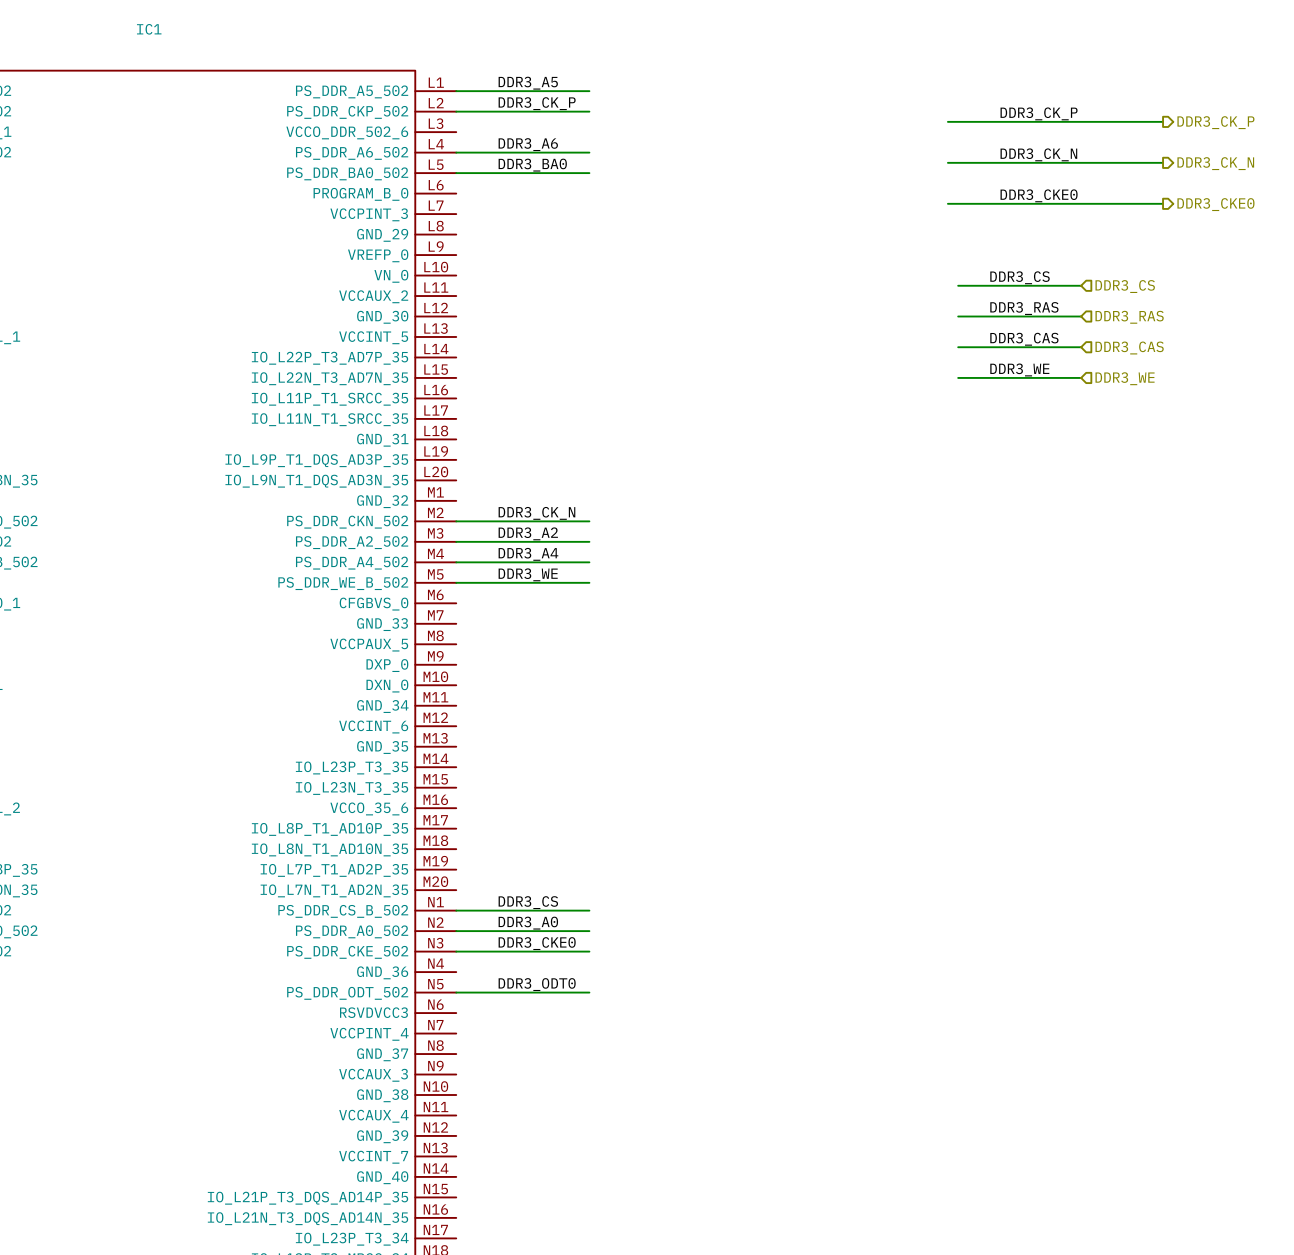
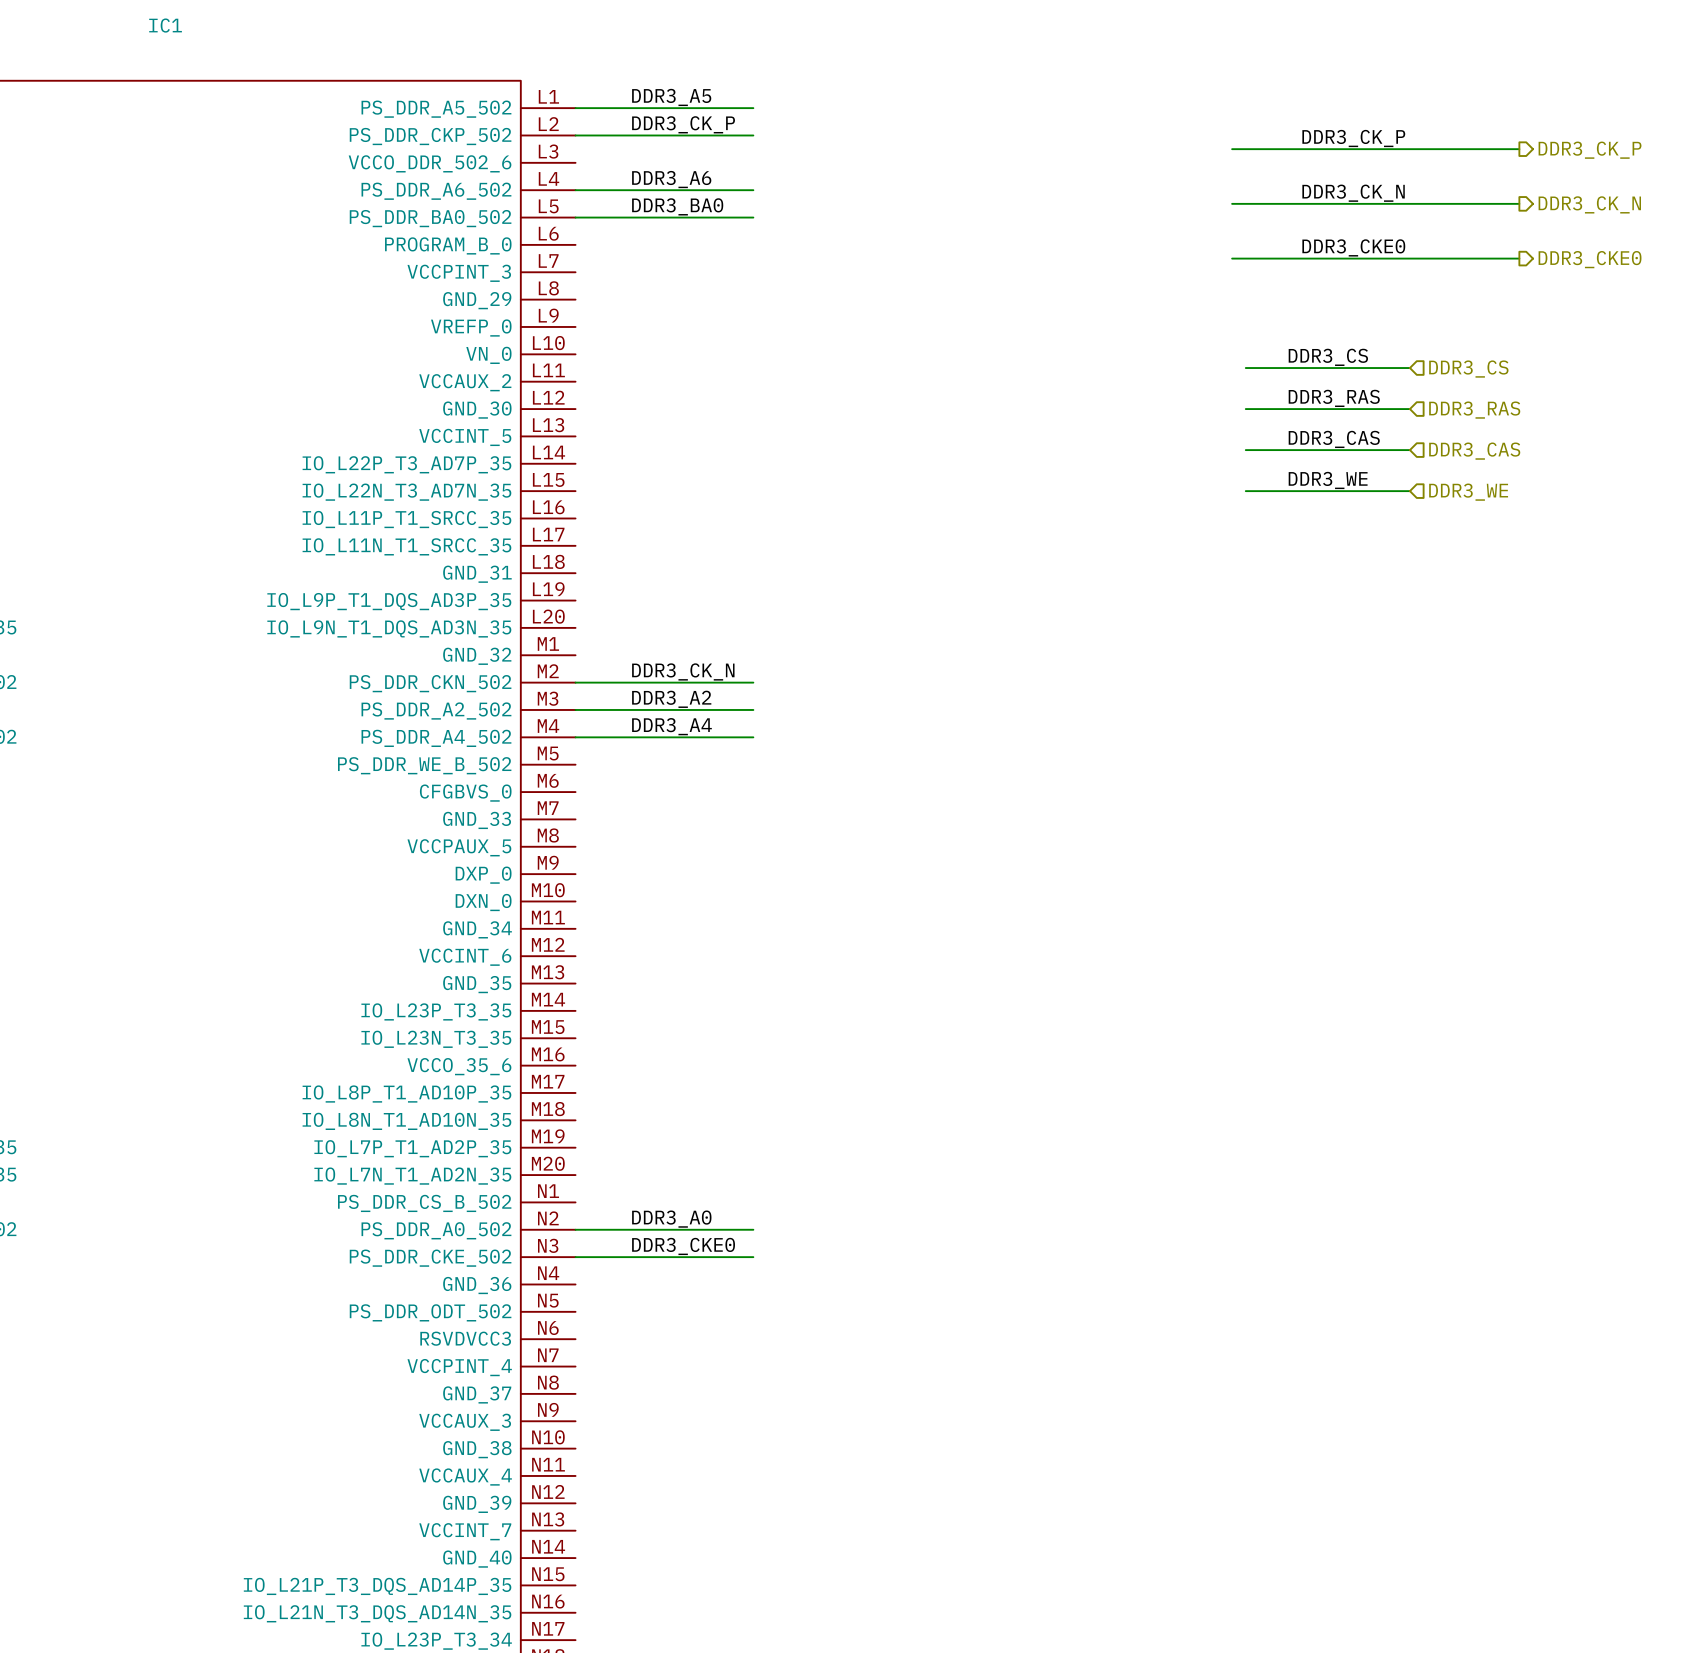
label: DDR3_WE (528, 574) -> none
wire: (456, 582) (589, 582) -> none
label: DDR3_CS (528, 902) -> none
wire: (456, 910) (589, 910) -> none
label: DDR3_ODT0 (537, 984) -> none
wire: (456, 992) (589, 992) -> none

